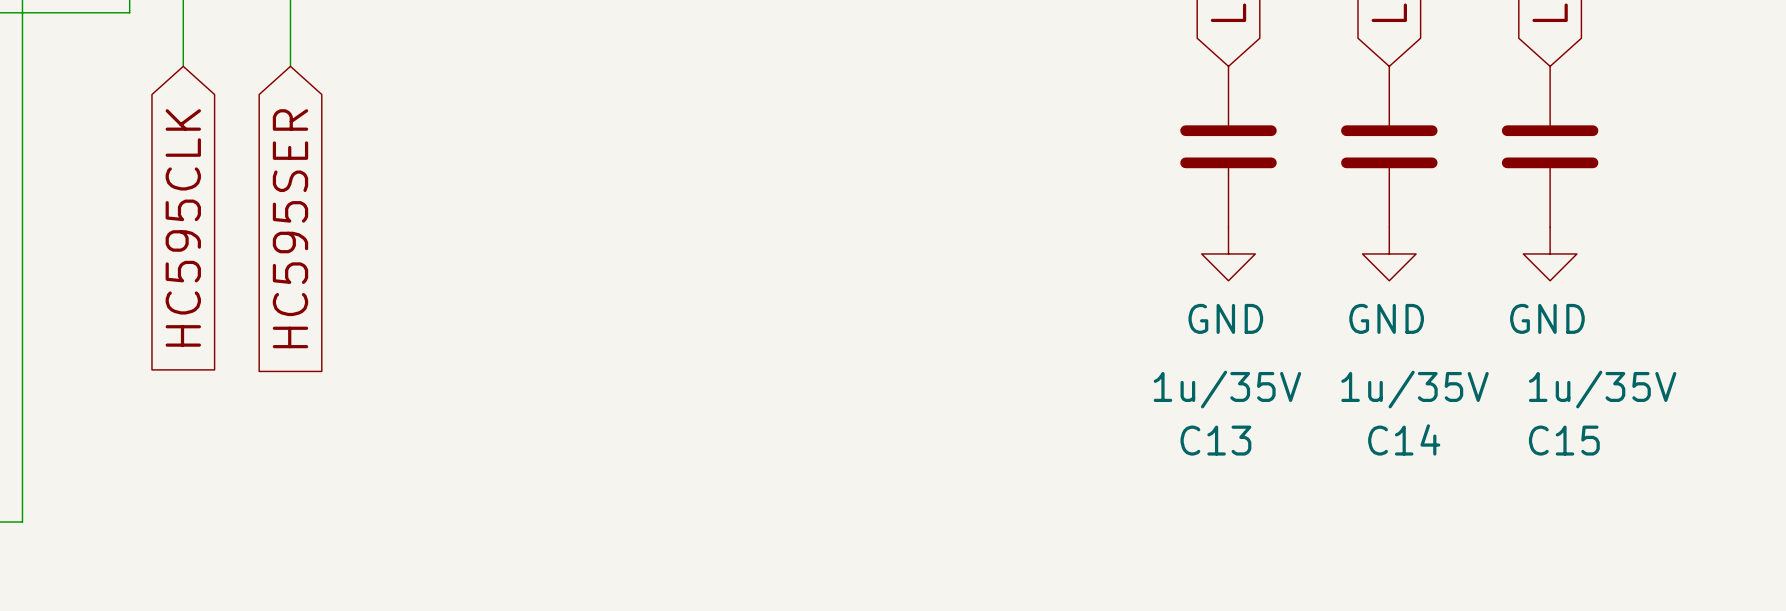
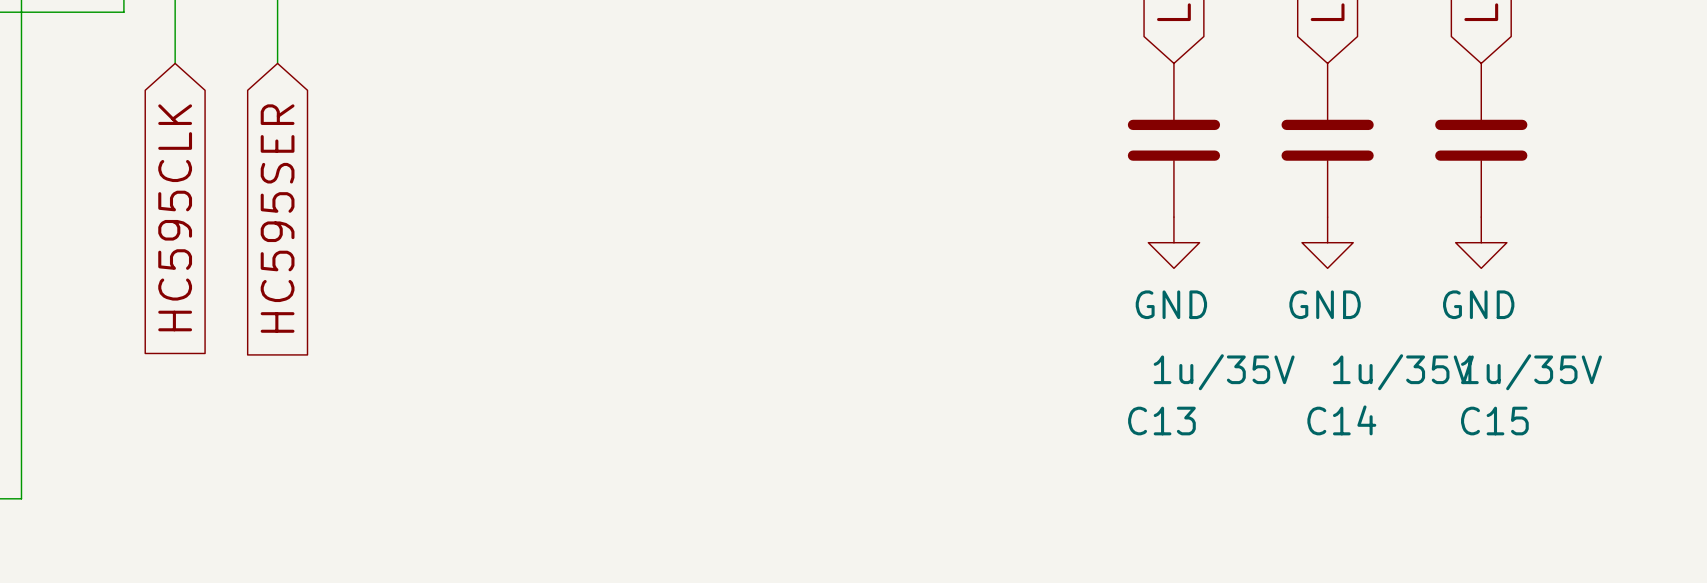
C13 value position: 1u/35V (1227, 389) -> 1u/35V (1224, 372)
C14 value position: 1u/35V (1415, 389) -> 1u/35V (1403, 372)

